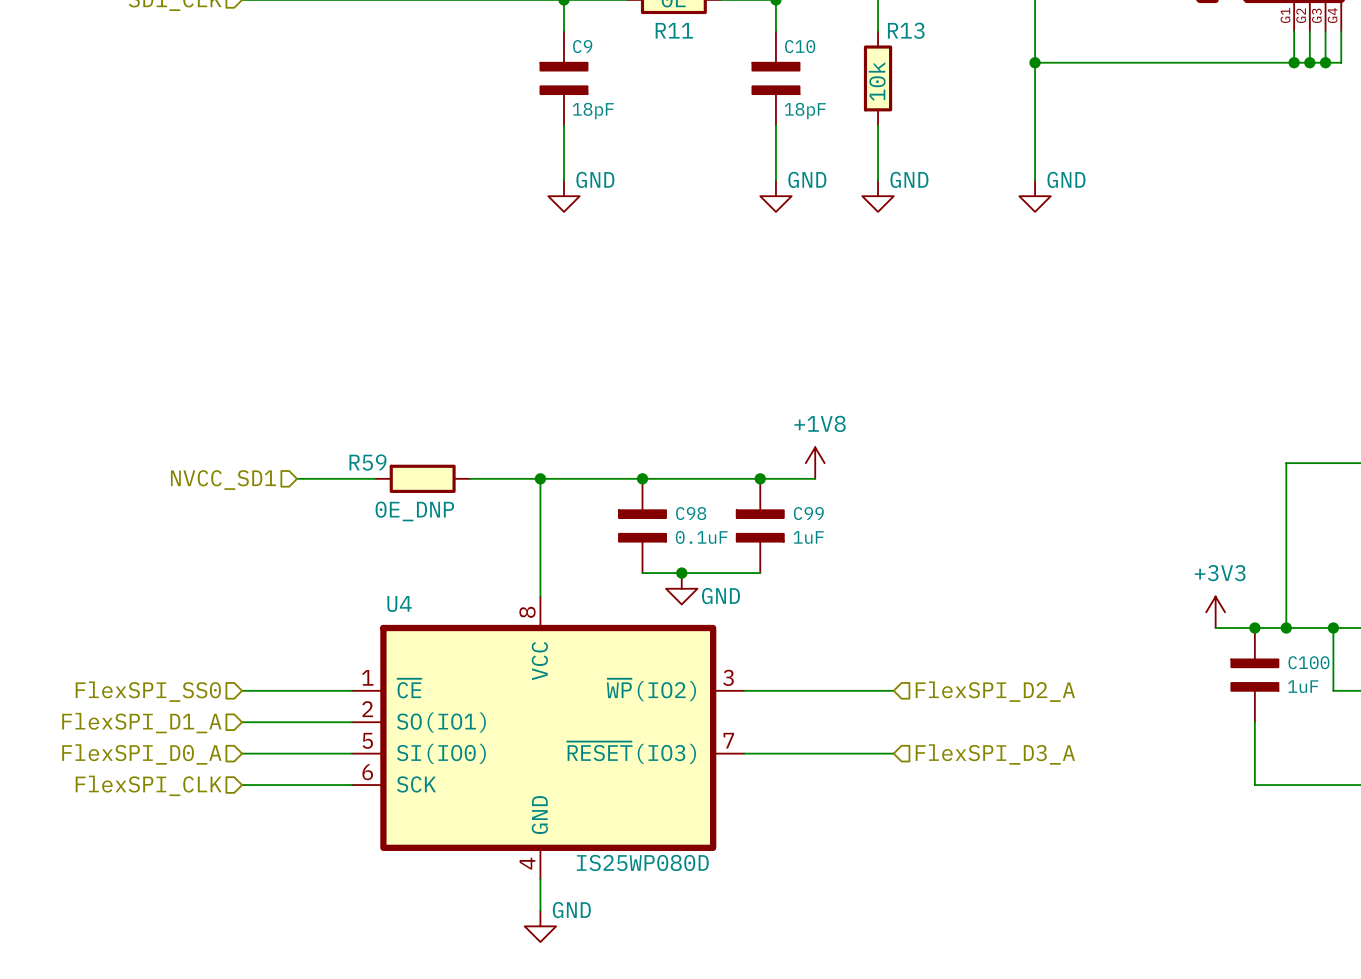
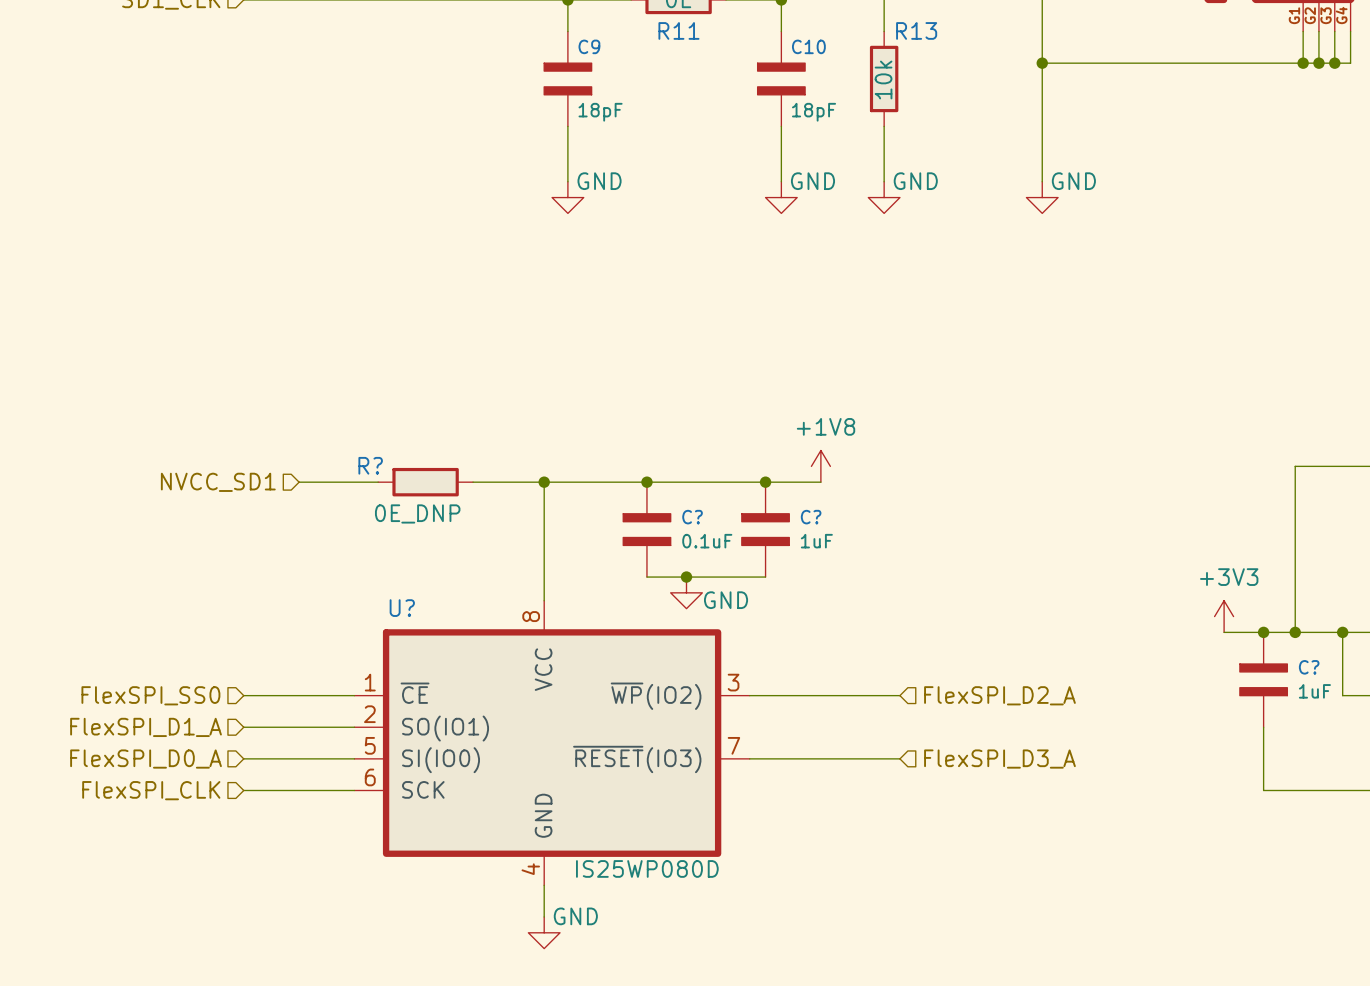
R59 name: R59 (368, 462) -> R? (370, 465)
C98 name: C98 (691, 513) -> C? (692, 517)
C99 name: C99 (808, 513) -> C? (811, 517)
U4 name: U4 (399, 604) -> U? (402, 608)
C100 name: C100 (1308, 662) -> C? (1309, 667)

